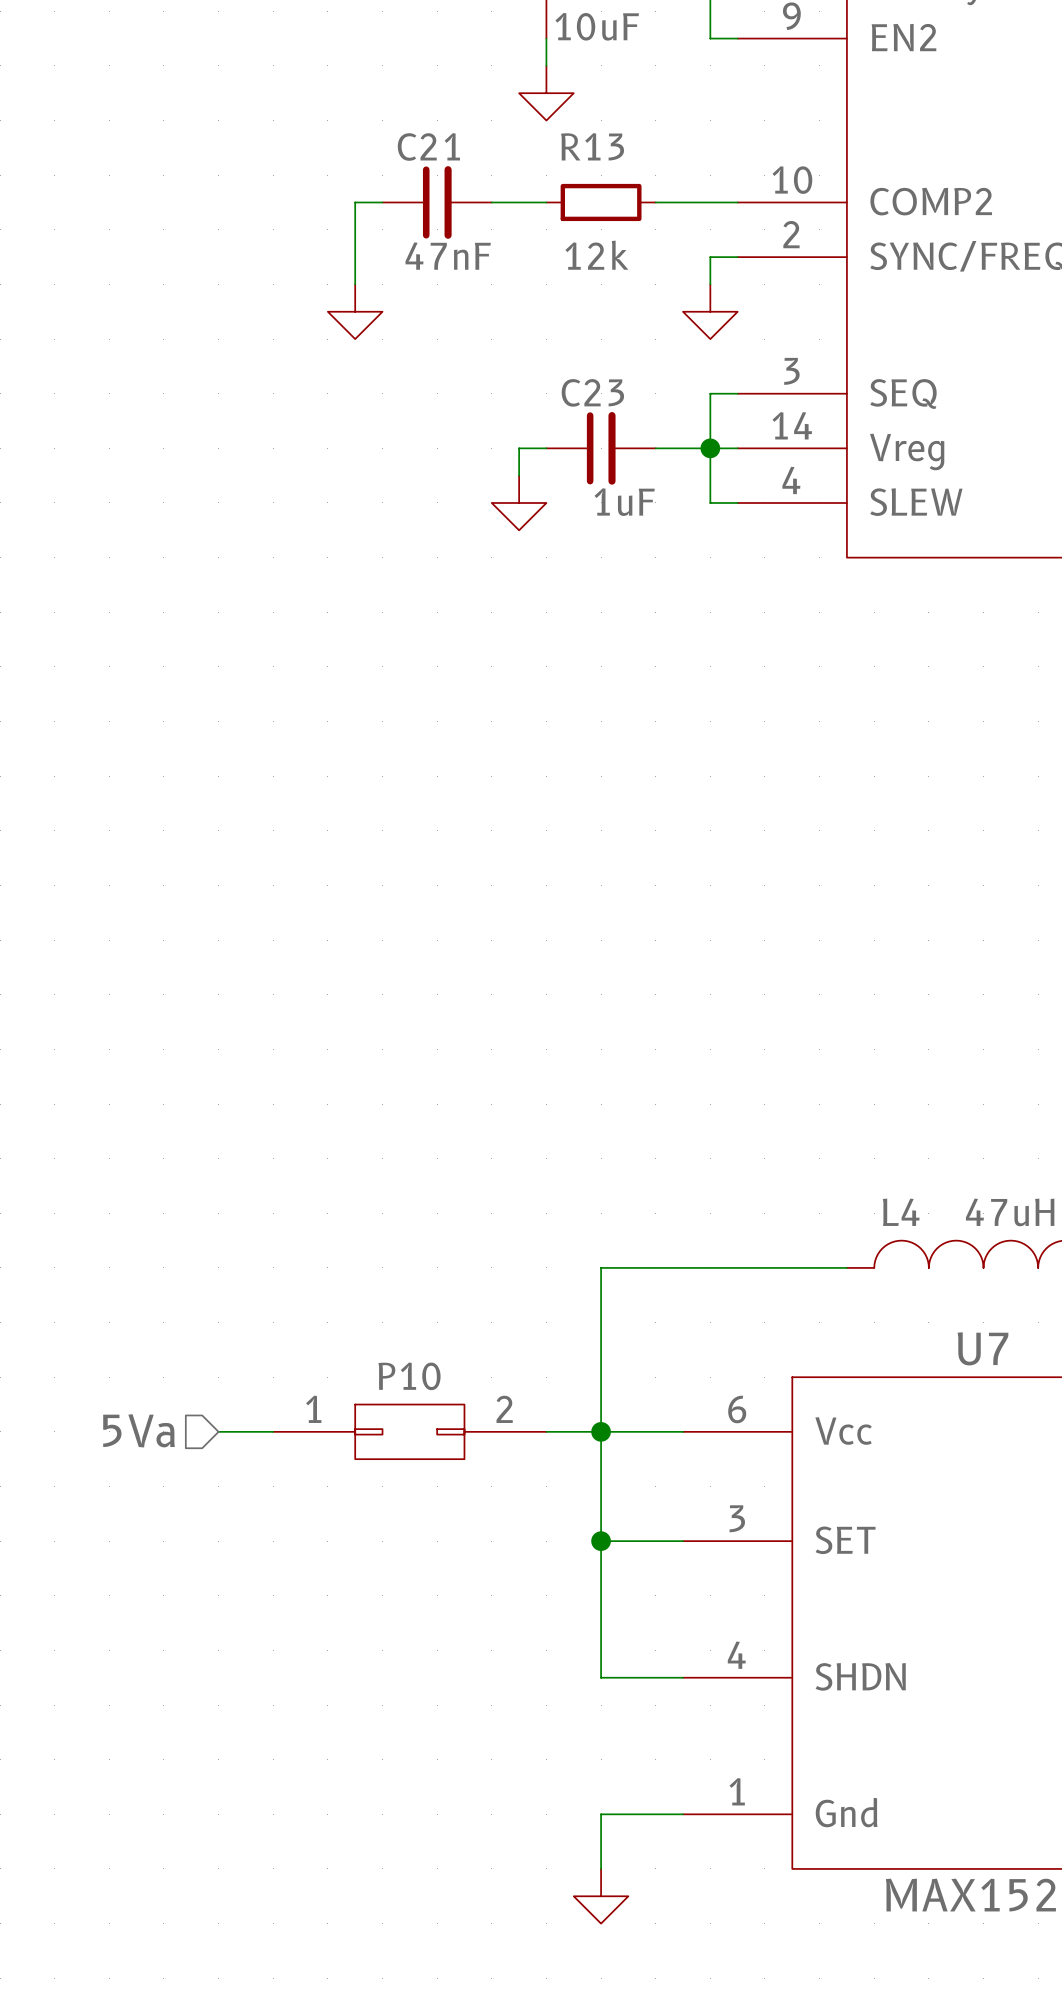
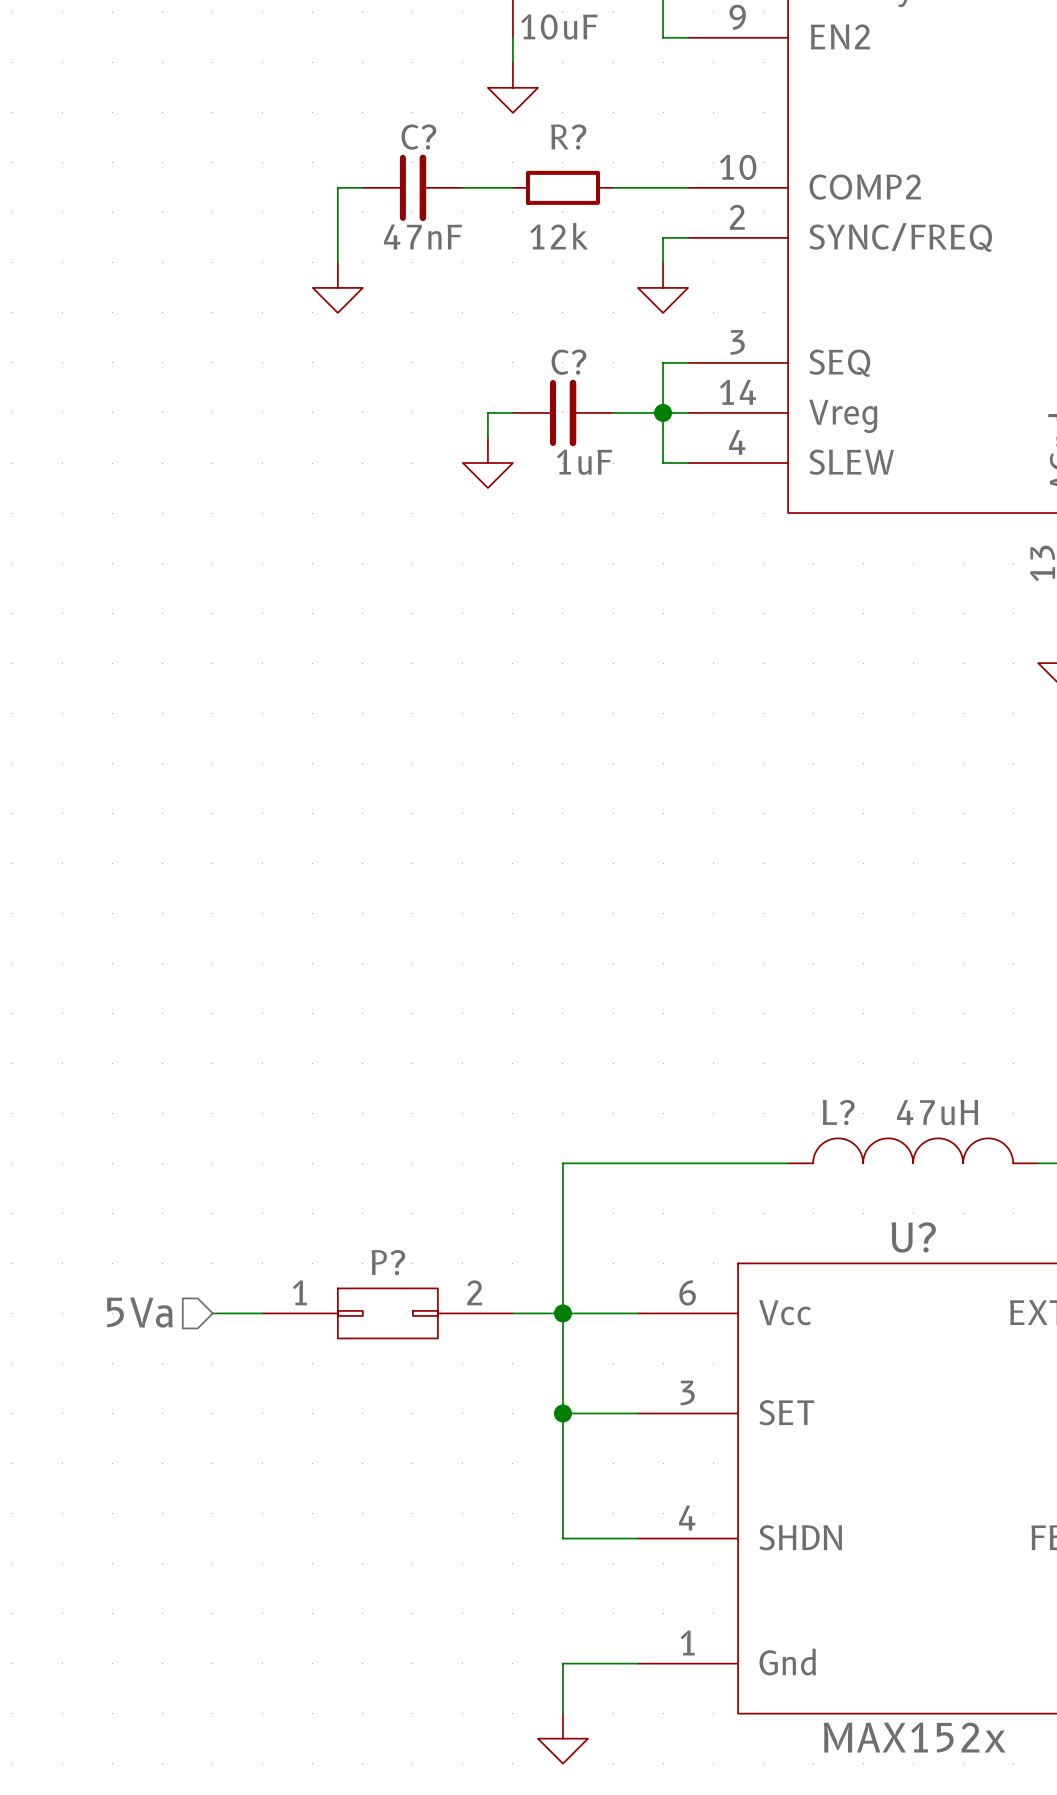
C21 name: C21 (428, 146) -> C? (418, 137)
R13 name: R13 (592, 146) -> R? (568, 137)
C23 name: C23 (592, 392) -> C? (568, 362)
L4 name: L4 (901, 1212) -> L? (838, 1112)
U7 name: U7 (983, 1348) -> U? (913, 1237)
P10 name: P10 (409, 1376) -> P? (388, 1262)

